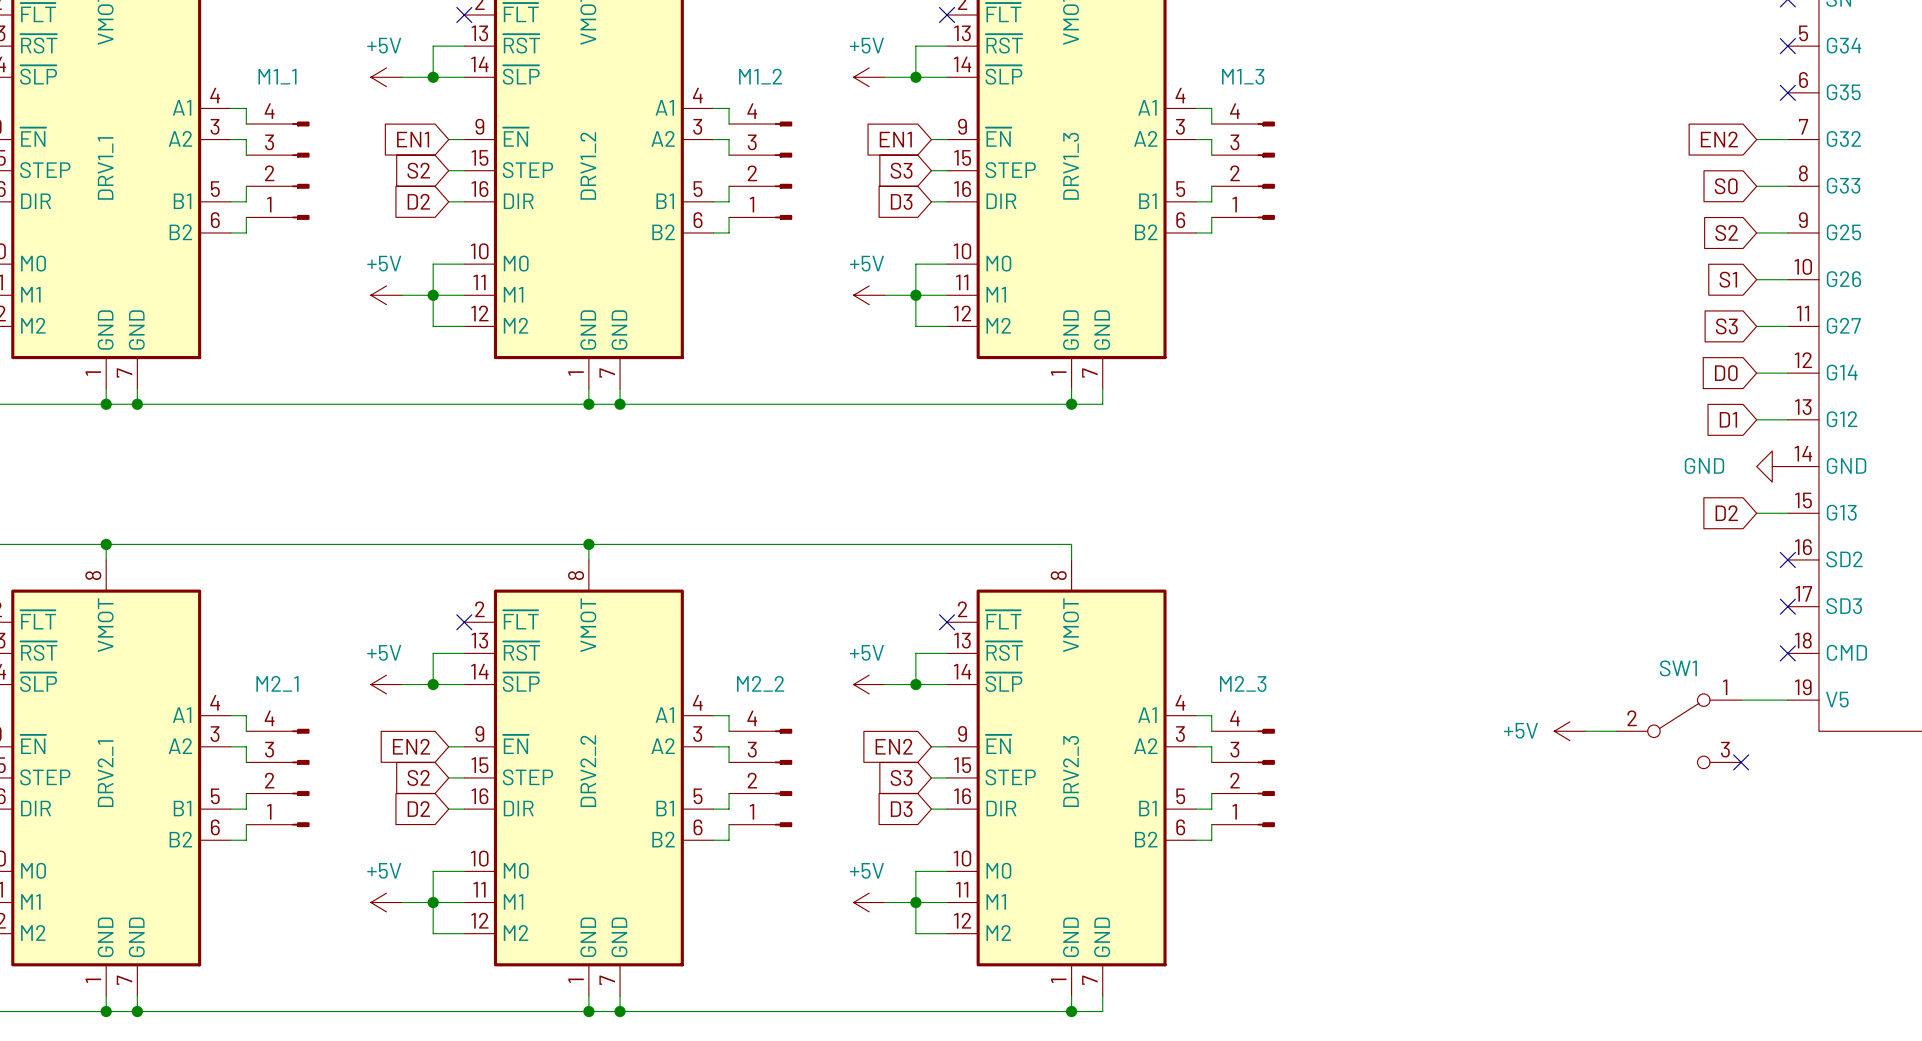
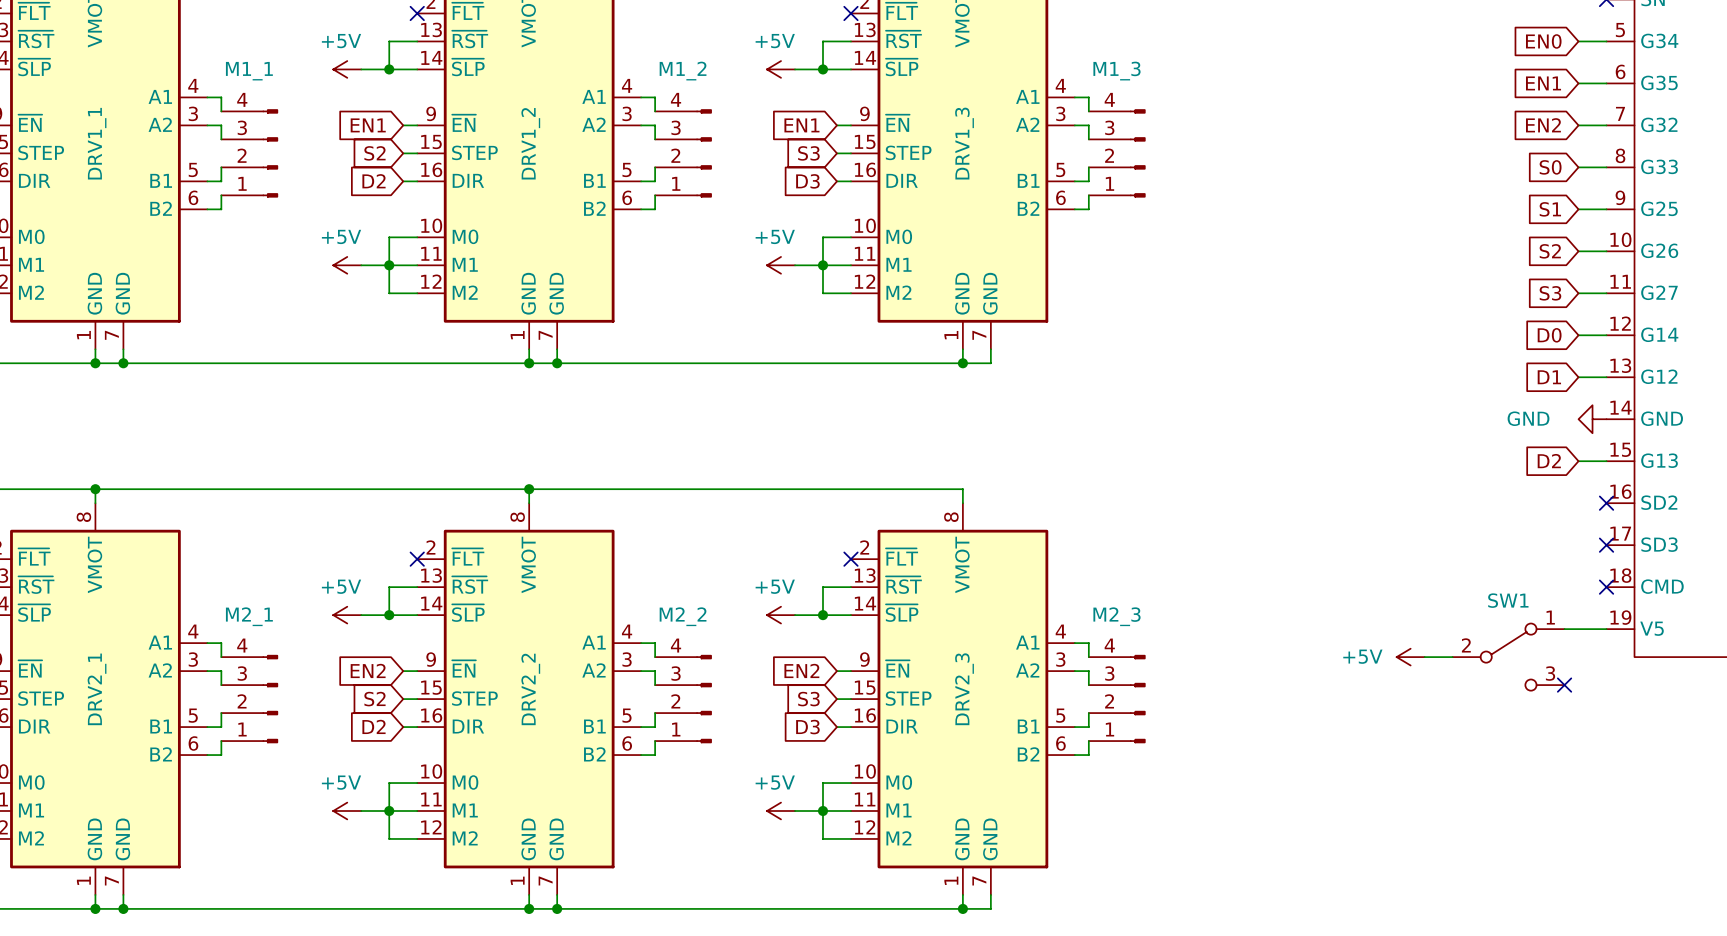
global label: none -> EN0 (1543, 41)
wire: none -> (1578, 41) (1606, 41)
no-connect mark: (1787, 46) -> none
global label: none -> EN1 (1543, 83)
wire: none -> (1578, 83) (1606, 83)
no-connect mark: (1787, 92) -> none
global label: S2 (1726, 232) -> S1 (1550, 209)
global label: S1 (1728, 279) -> S2 (1550, 251)

